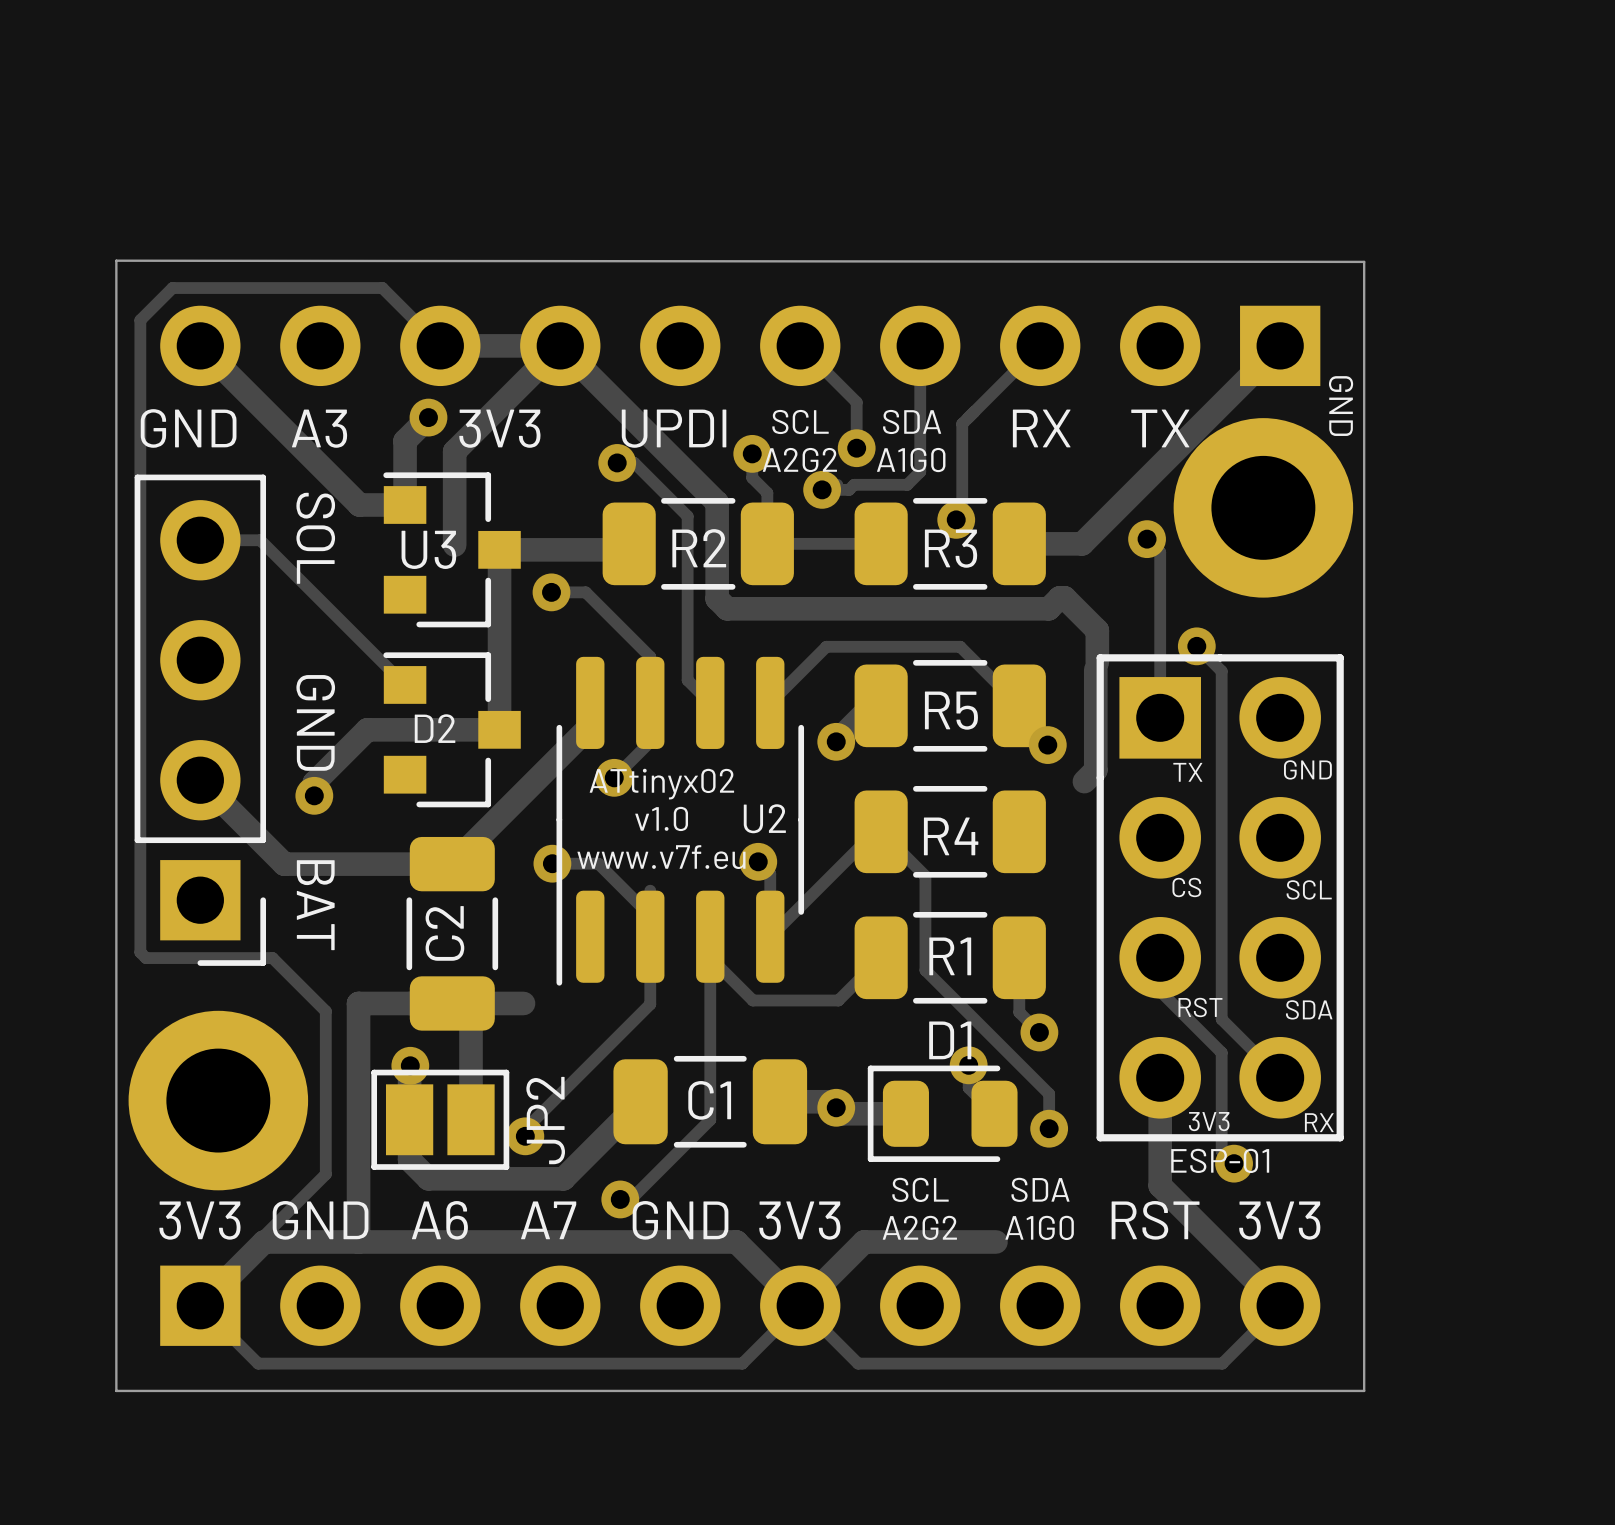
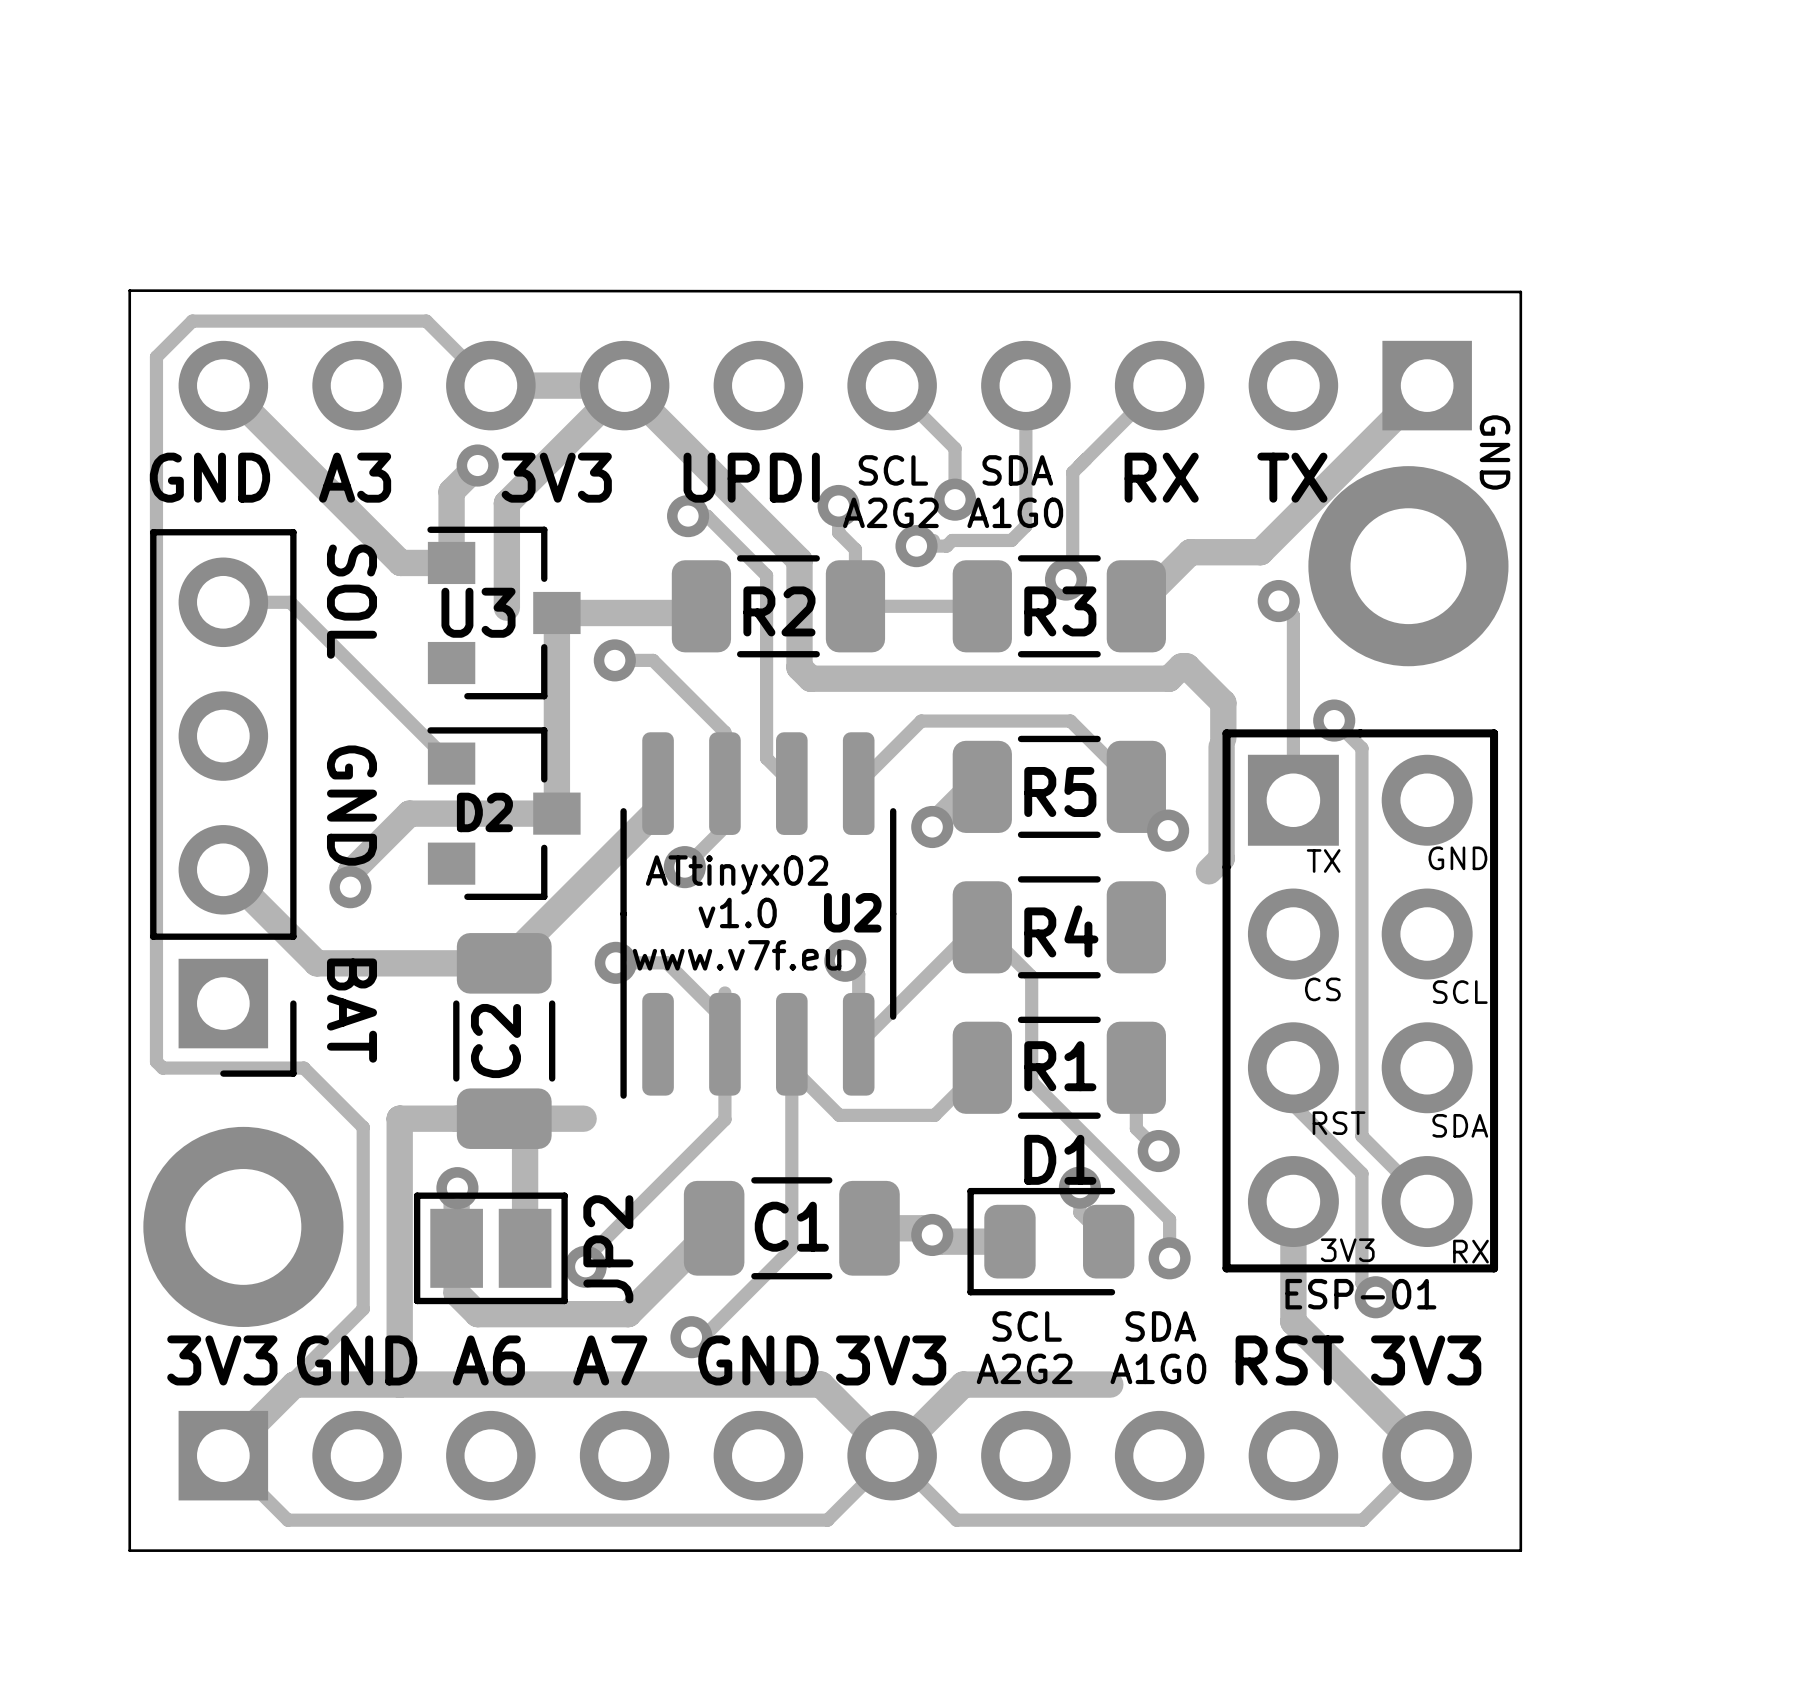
track: (1130, 495) (1082, 543) (1019, 543) -> (1260, 552) (1190, 552) (1136, 606)

